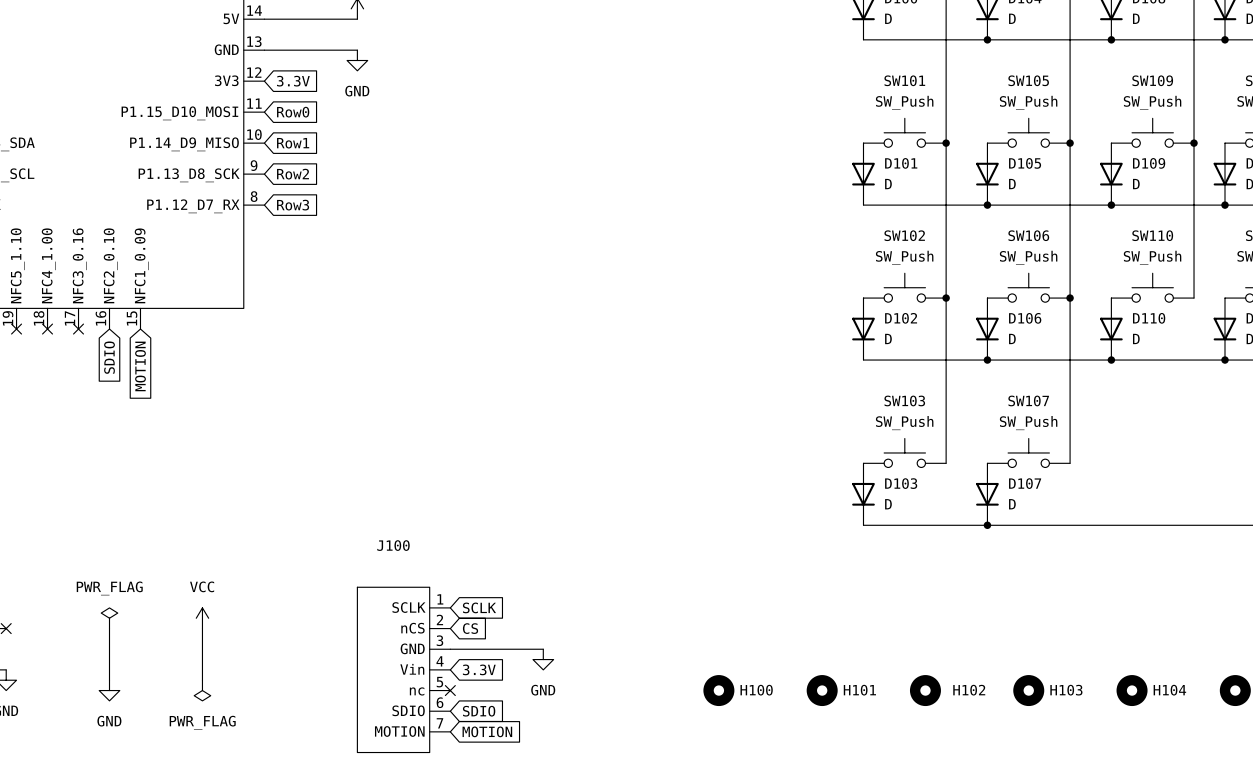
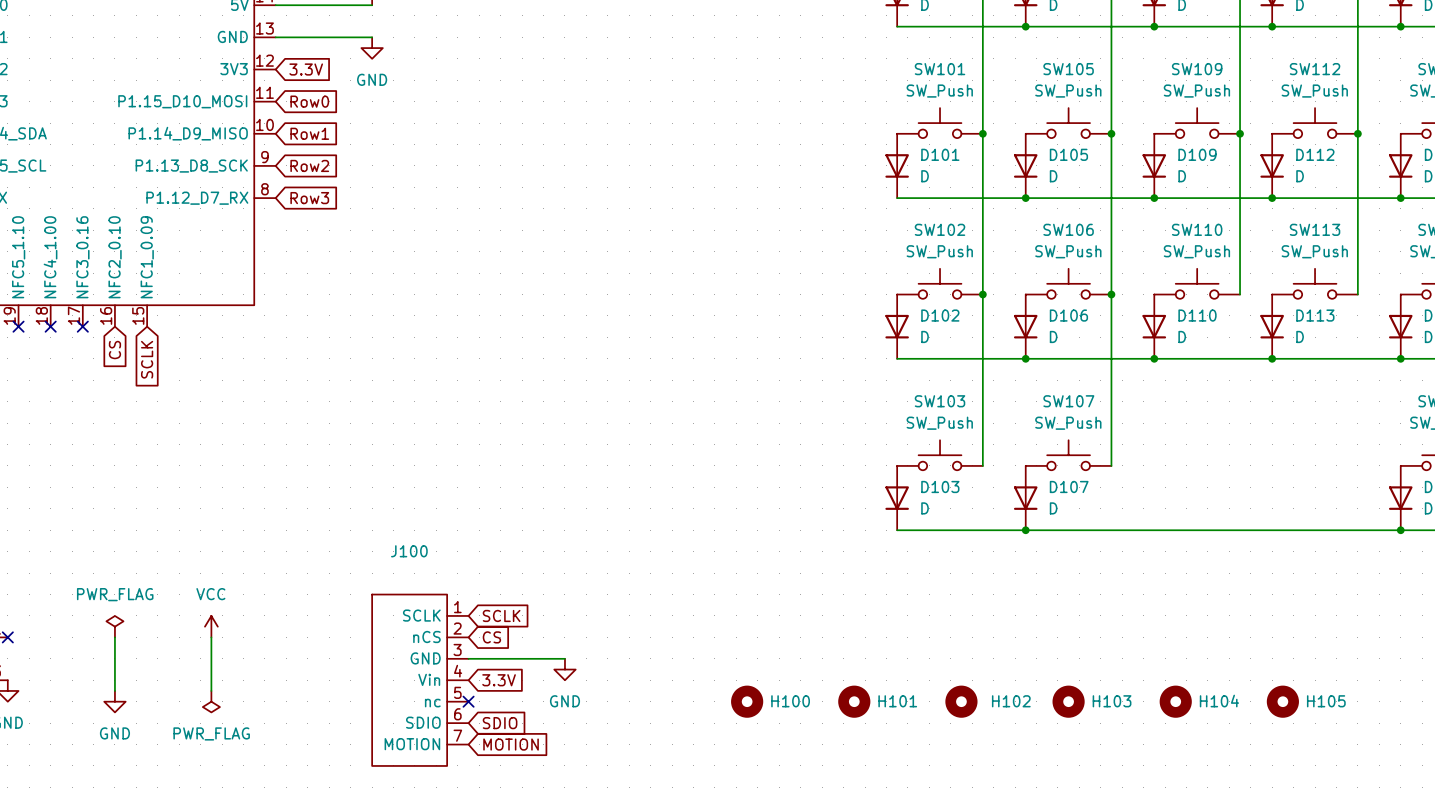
global label: SDIO (109, 357) -> CS (114, 350)
global label: MOTION (140, 366) -> SCLK (147, 359)

